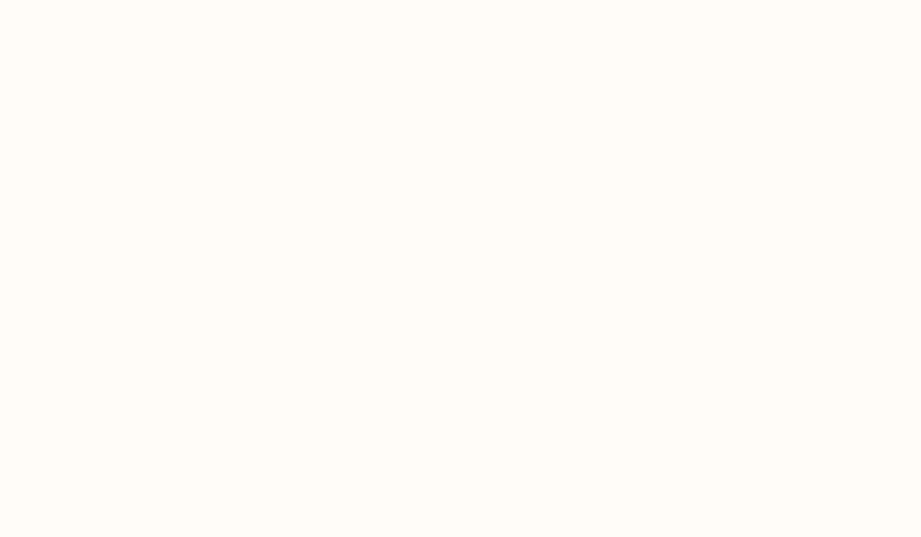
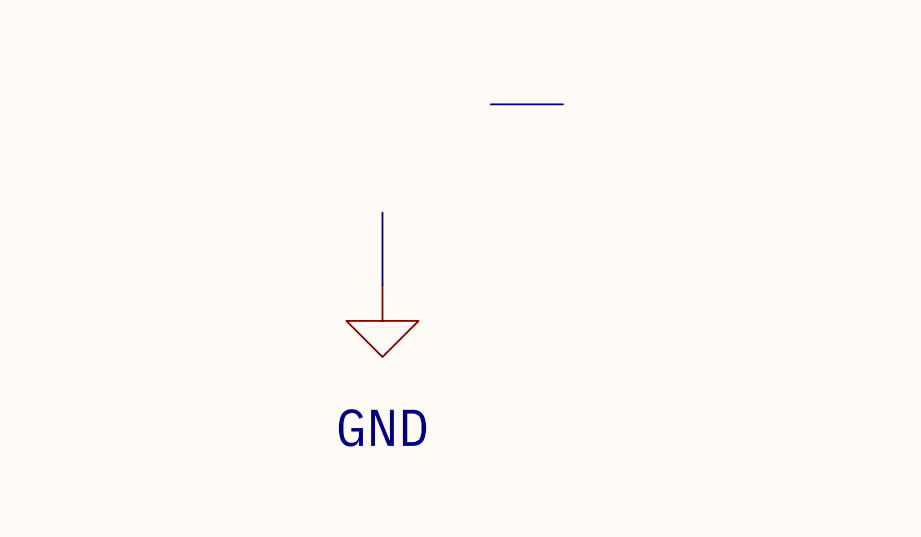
wire: none -> (490, 104) (562, 104)
wire: none -> (382, 212) (382, 284)
power symbol: none -> GND (382, 320)

